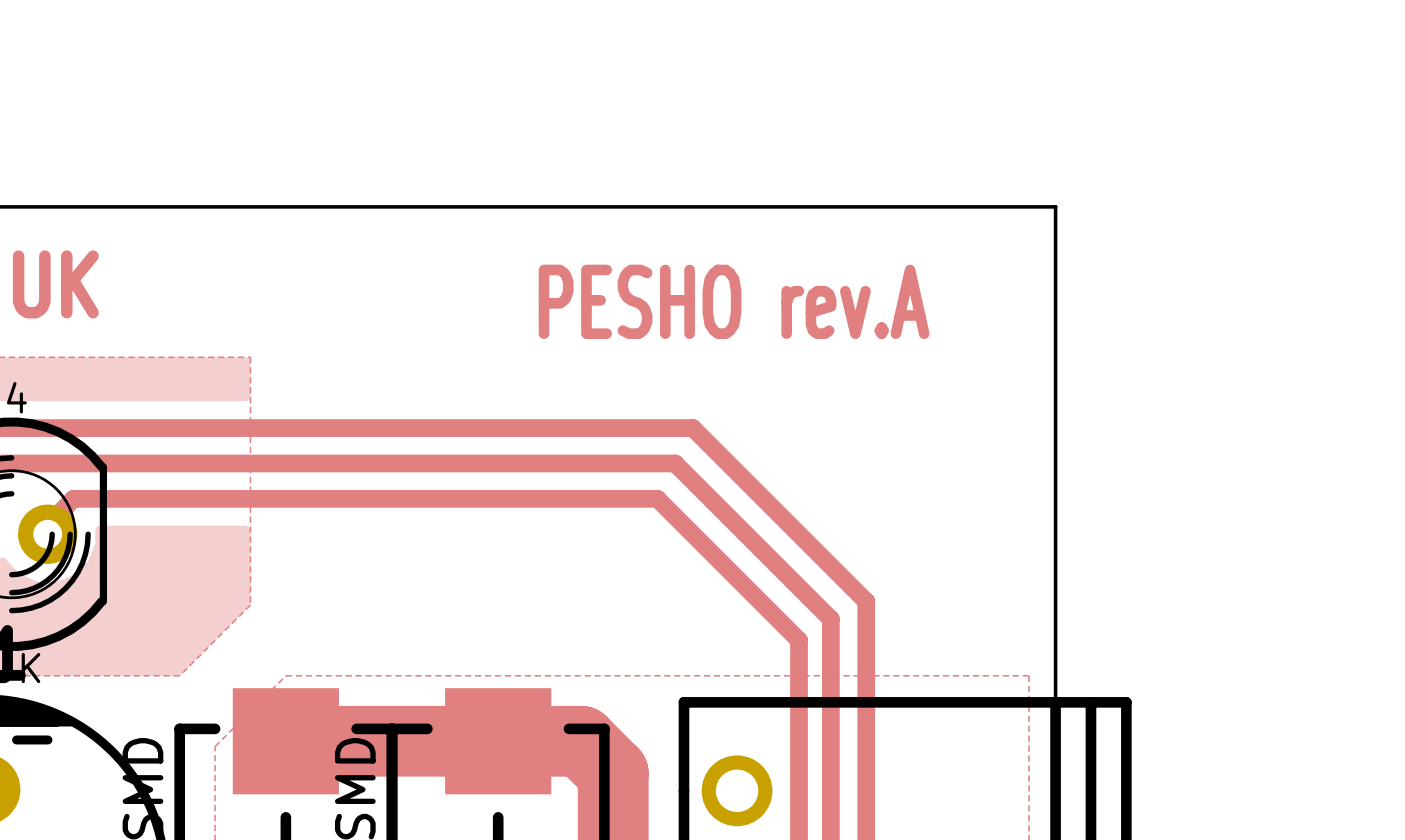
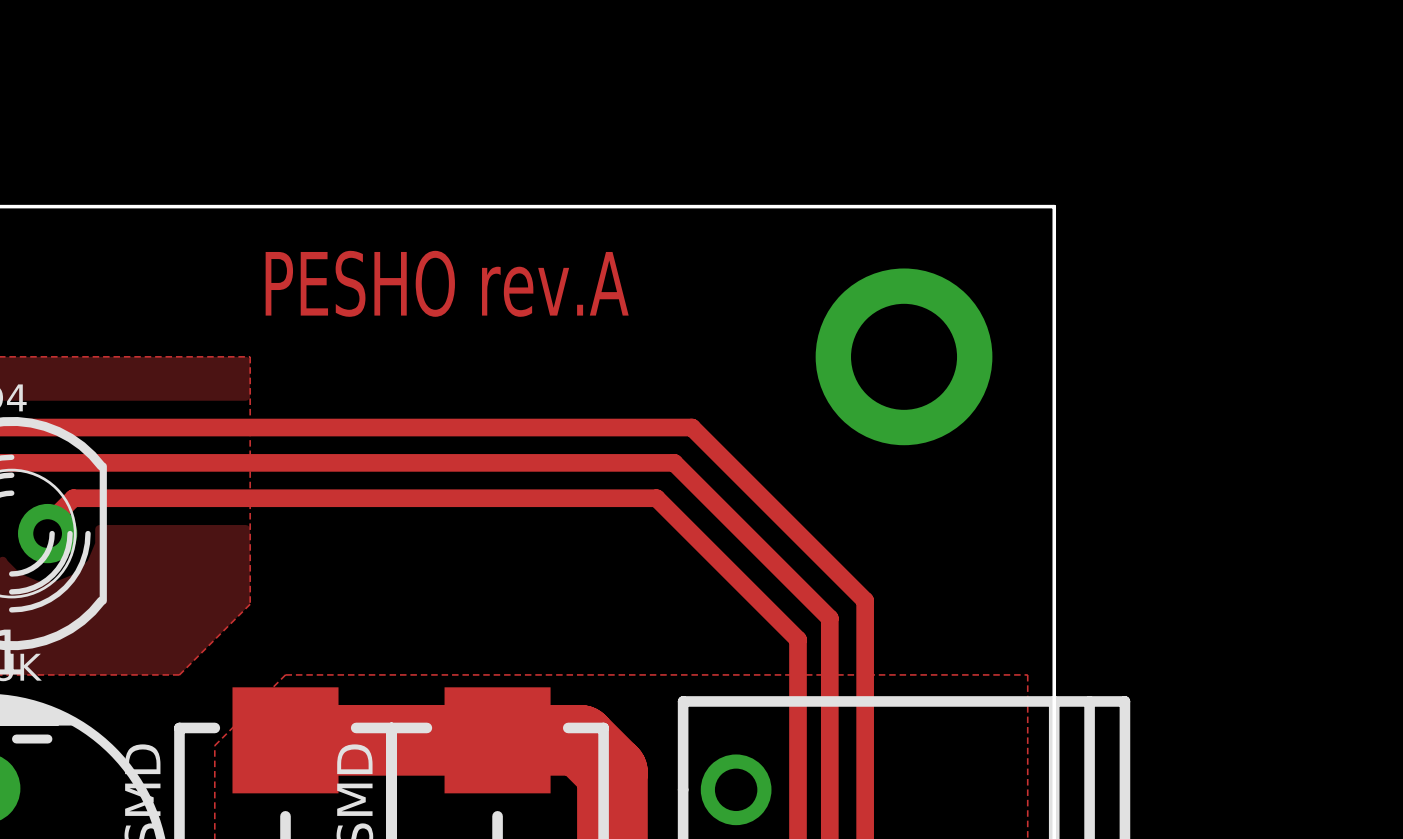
text position: PESHO rev.A (734, 301) -> PESHO rev.A (447, 283)
via: none -> (904, 356)

